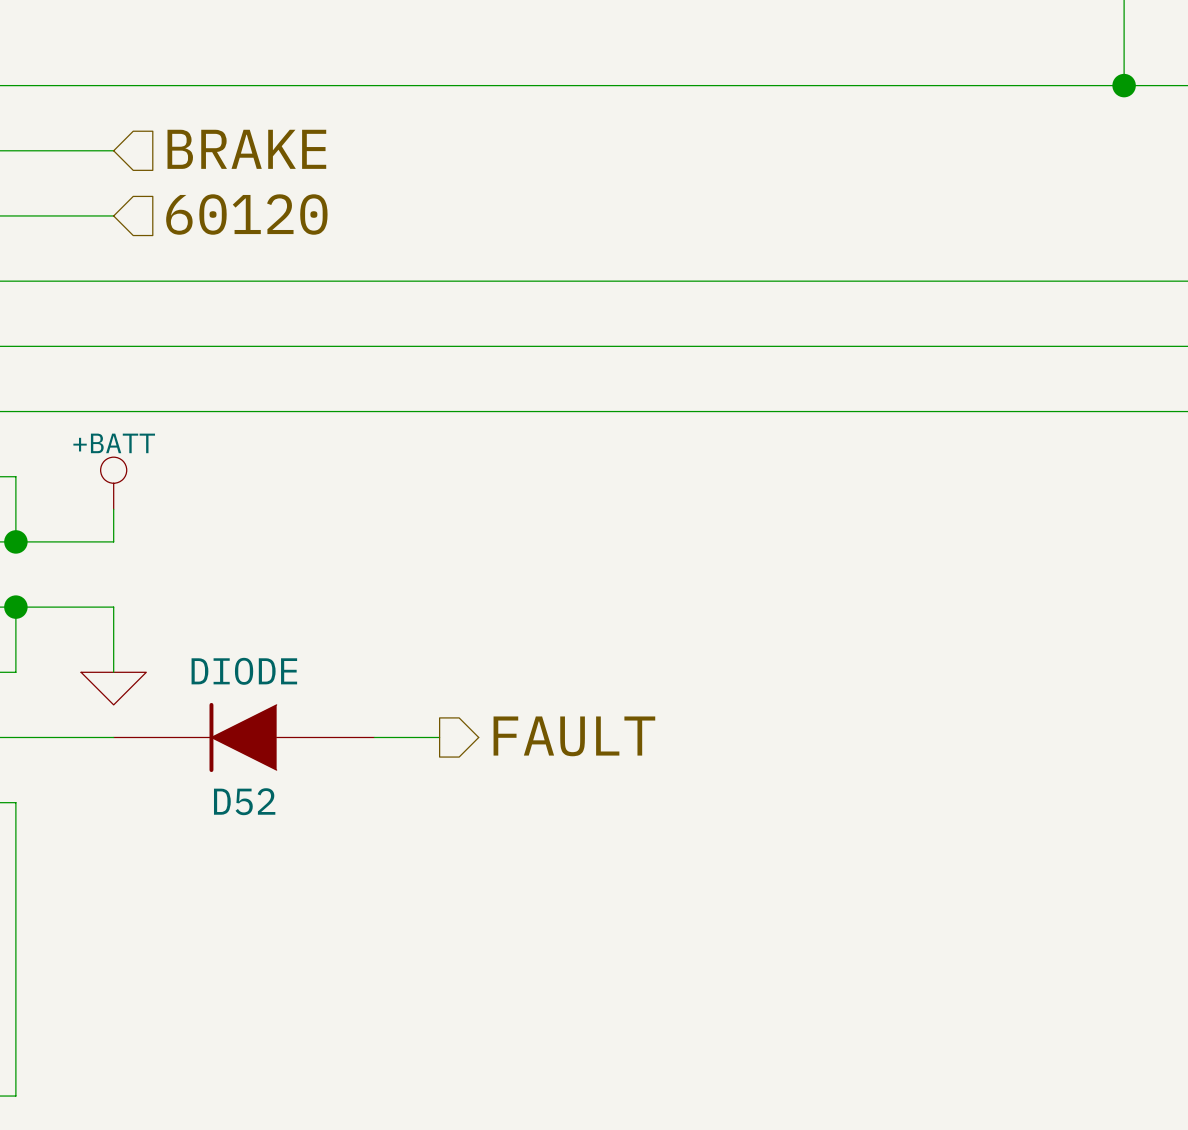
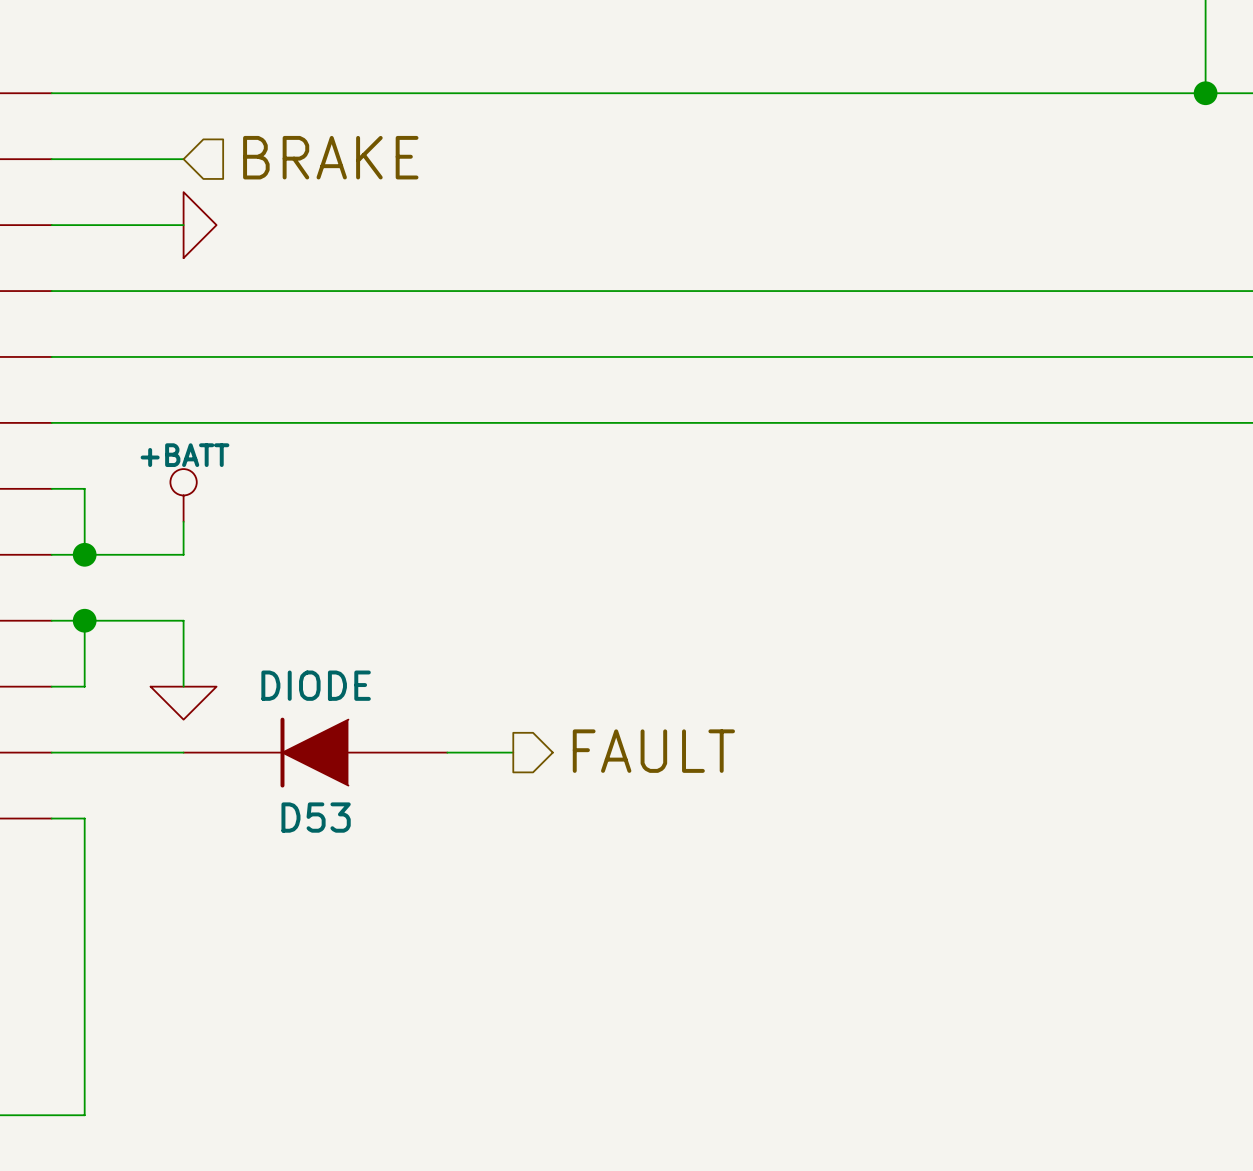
hierarchical label: 60120 (246, 214) -> none
power symbol: none -> (200, 225)
D52 name: D52 (244, 801) -> D53 (316, 817)

